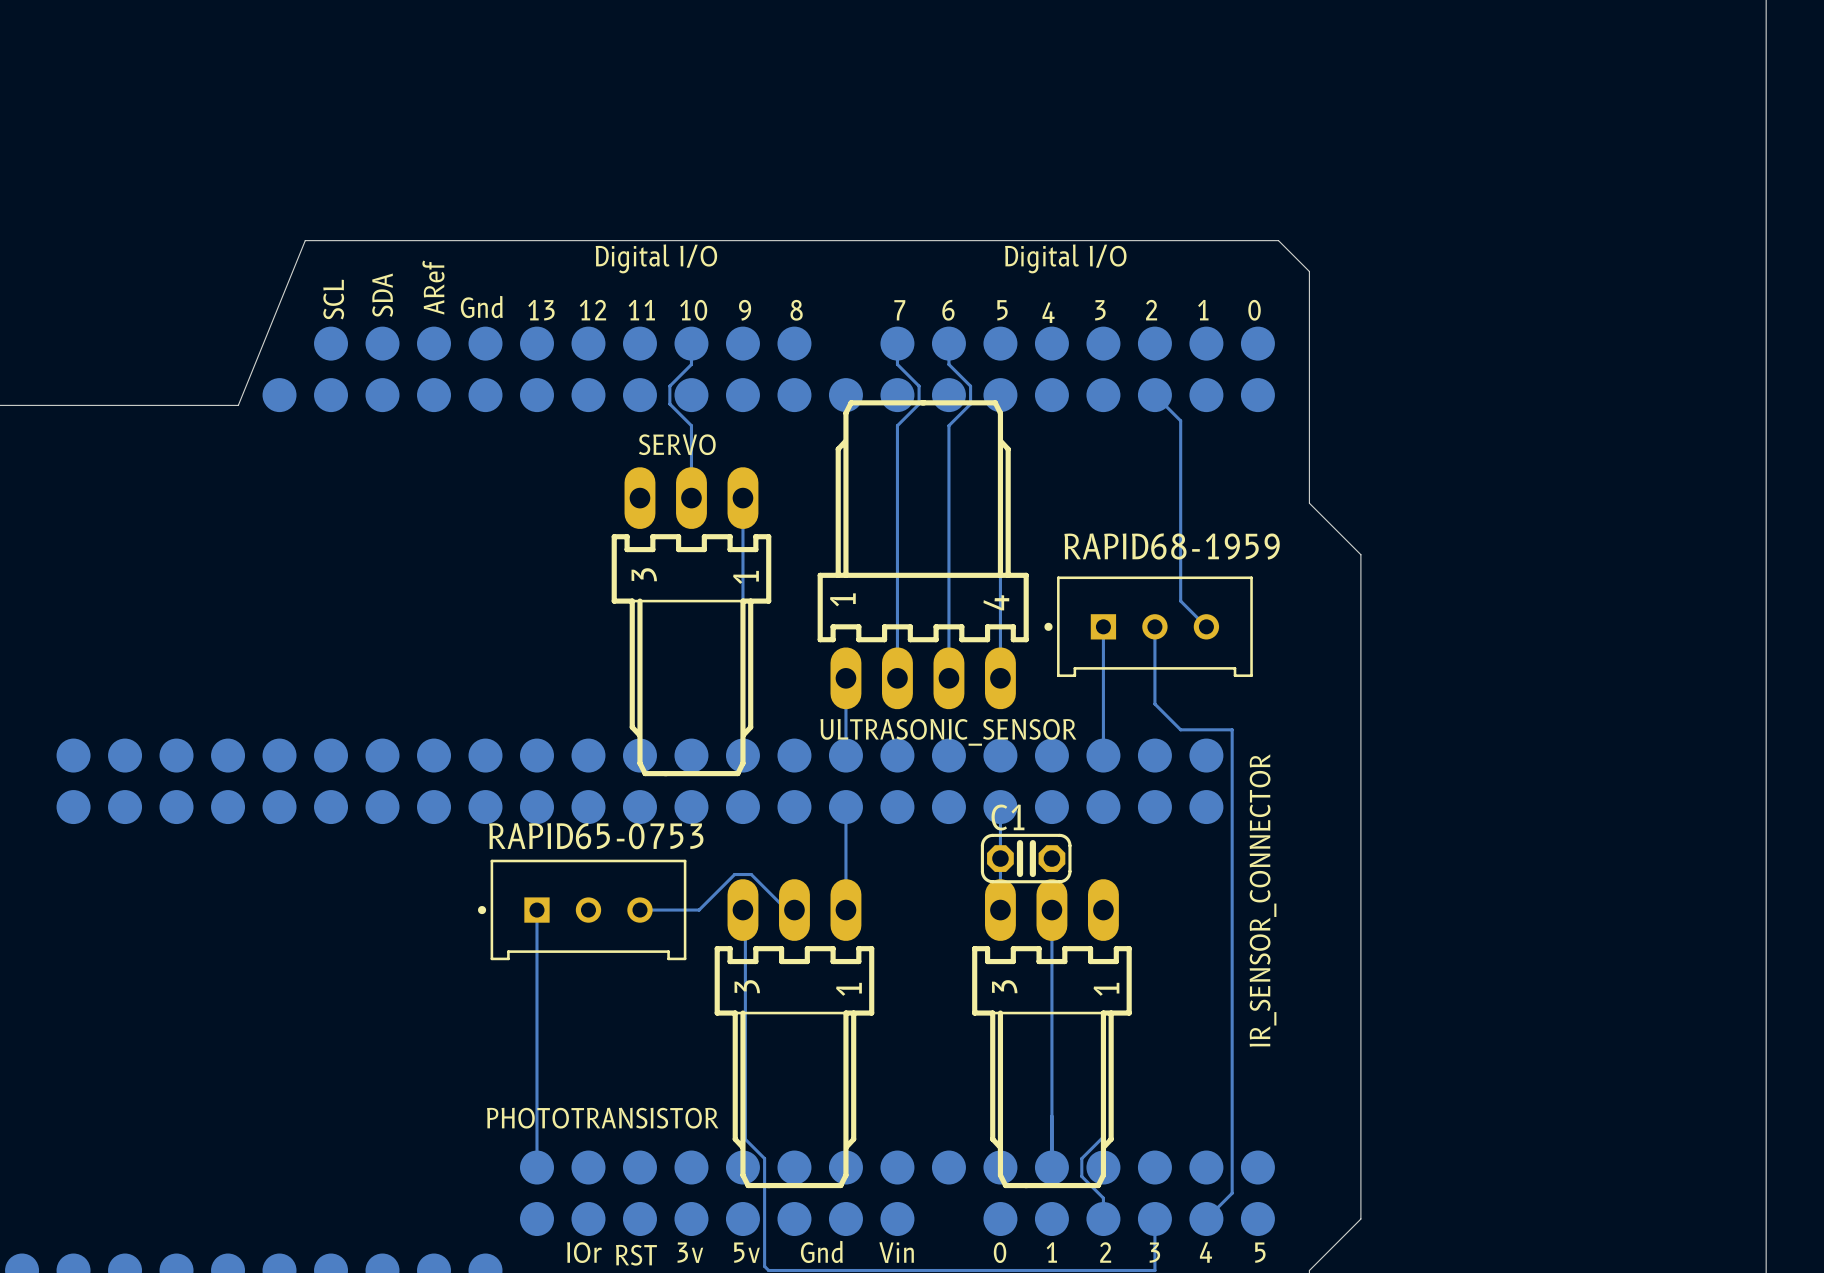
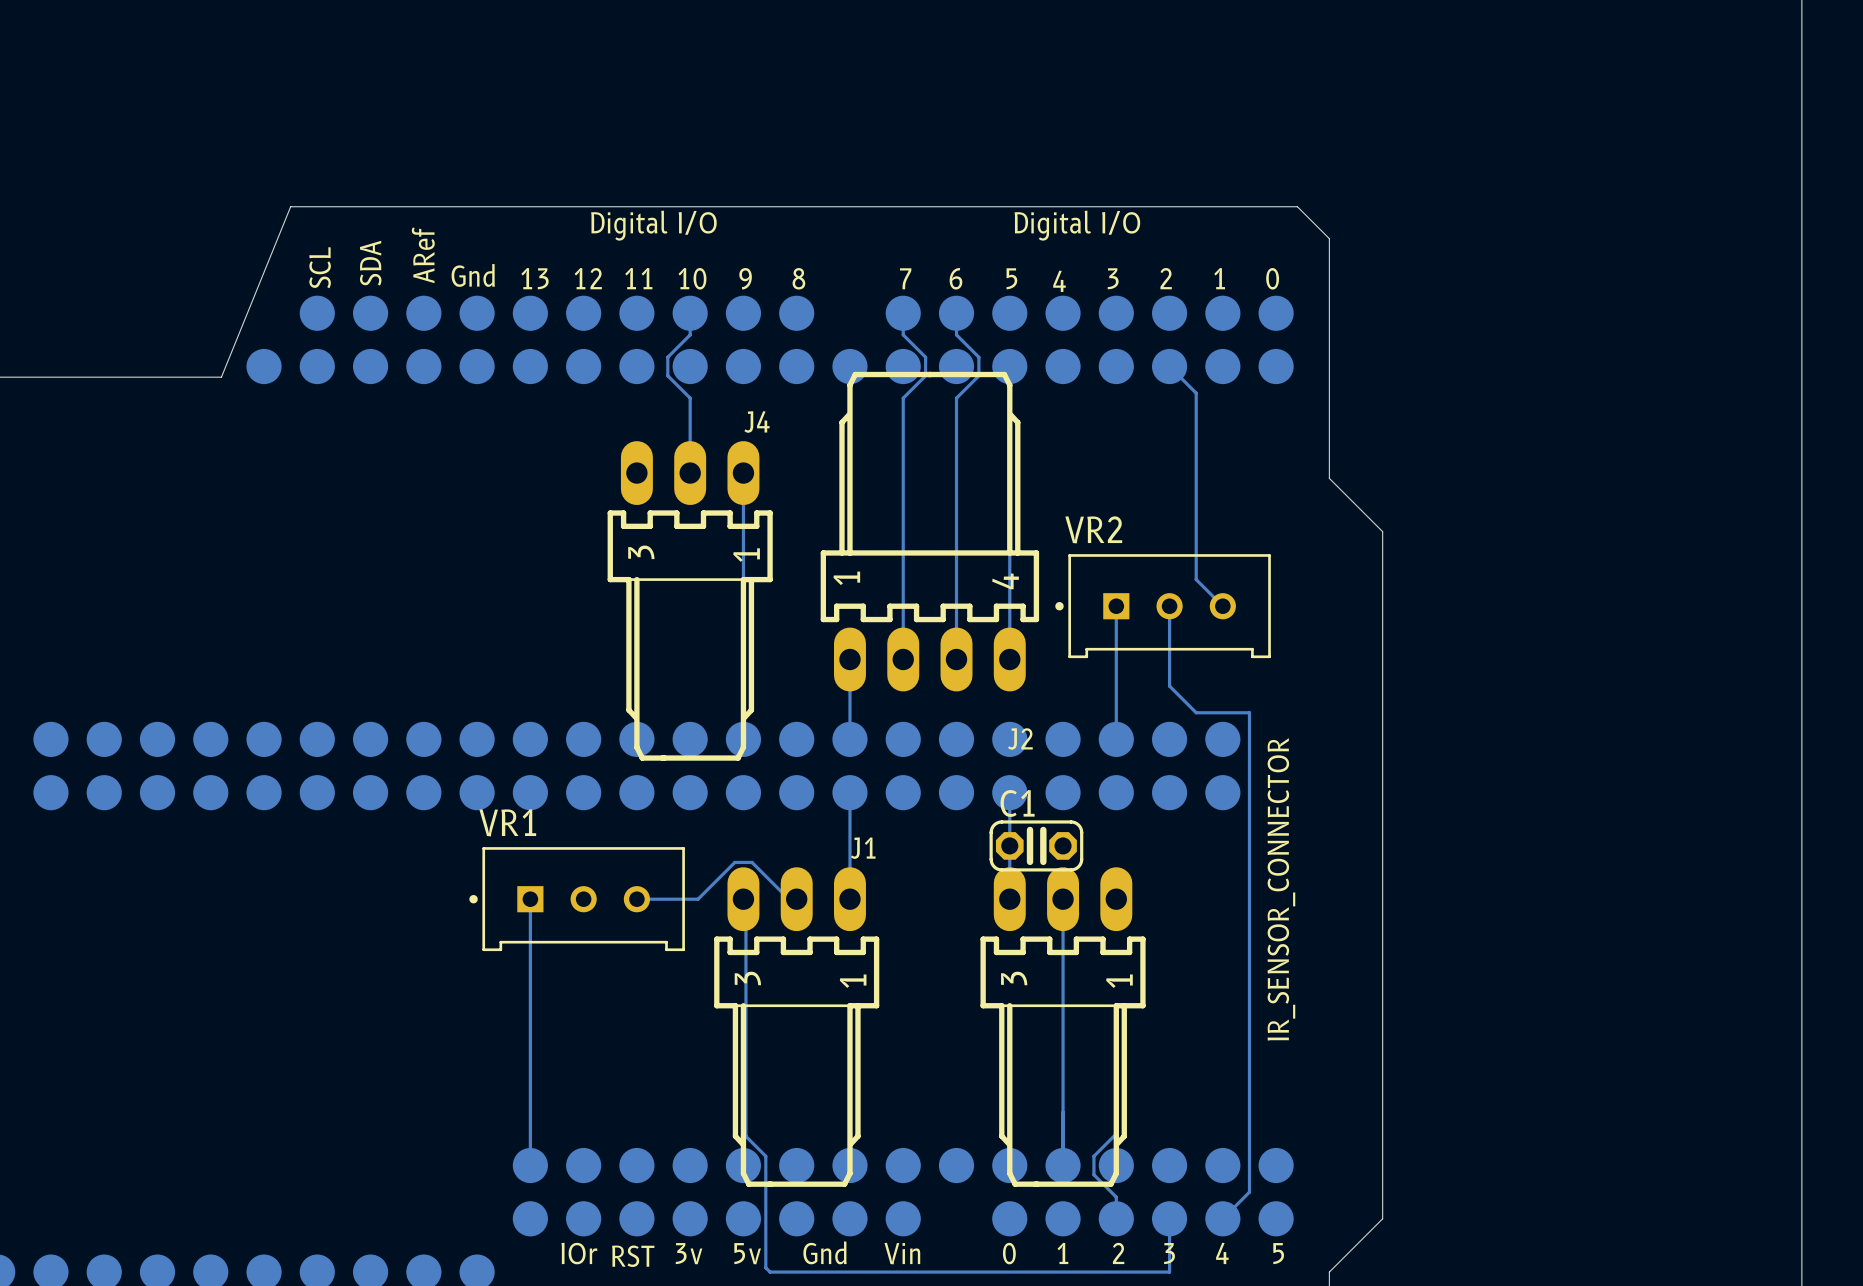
SERVO name: SERVO (677, 444) -> J4 (757, 422)
RAPID68-1959 name: RAPID68-1959 (1172, 546) -> VR2 (1093, 529)
ULTRASONIC_SENSOR name: ULTRASONIC_SENSOR (948, 732) -> J2 (1020, 738)
RAPID65-0753 name: RAPID65-0753 (596, 836) -> VR1 (507, 822)
PHOTOTRANSISTOR name: PHOTOTRANSISTOR (602, 1118) -> J1 (863, 848)

